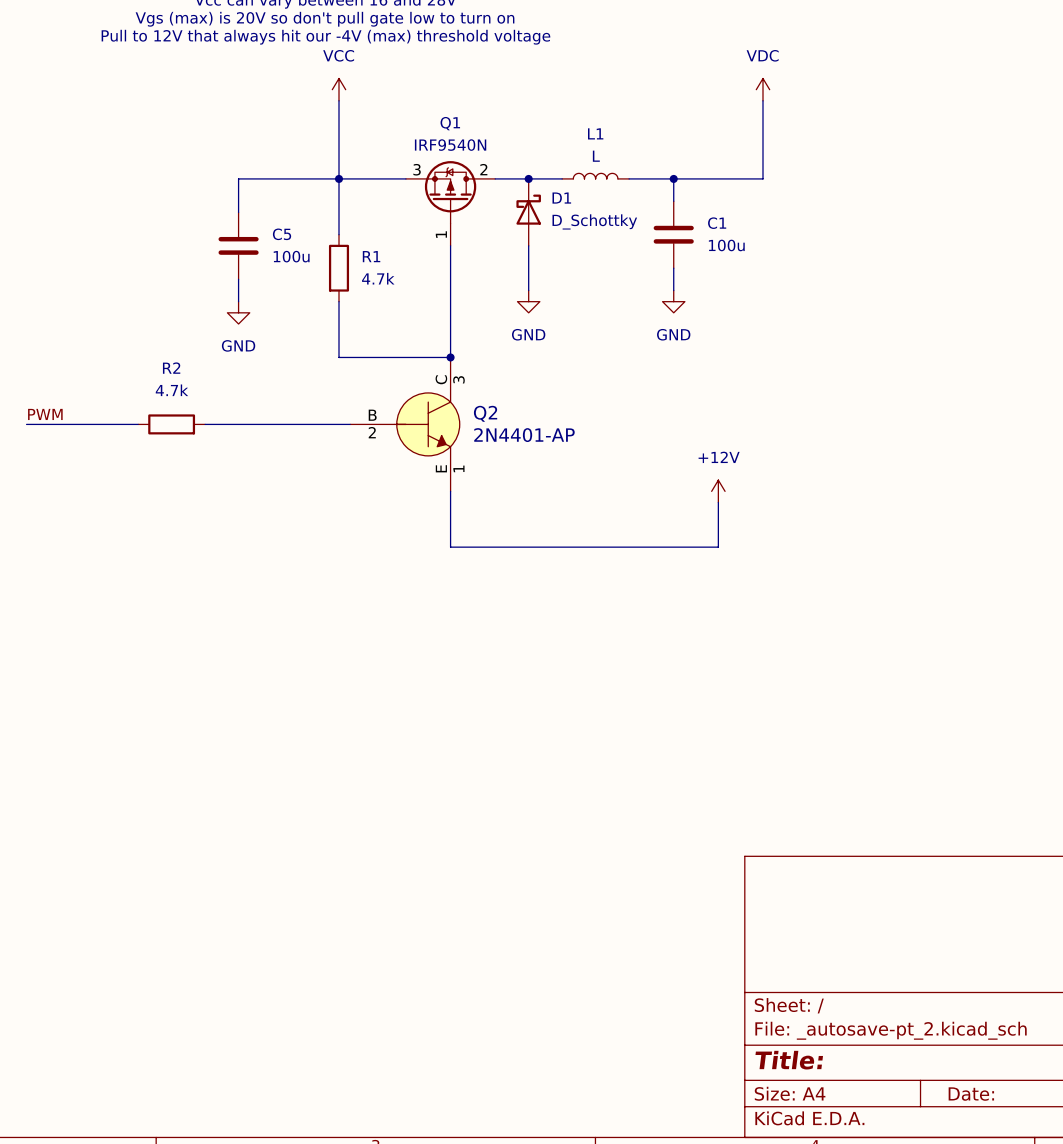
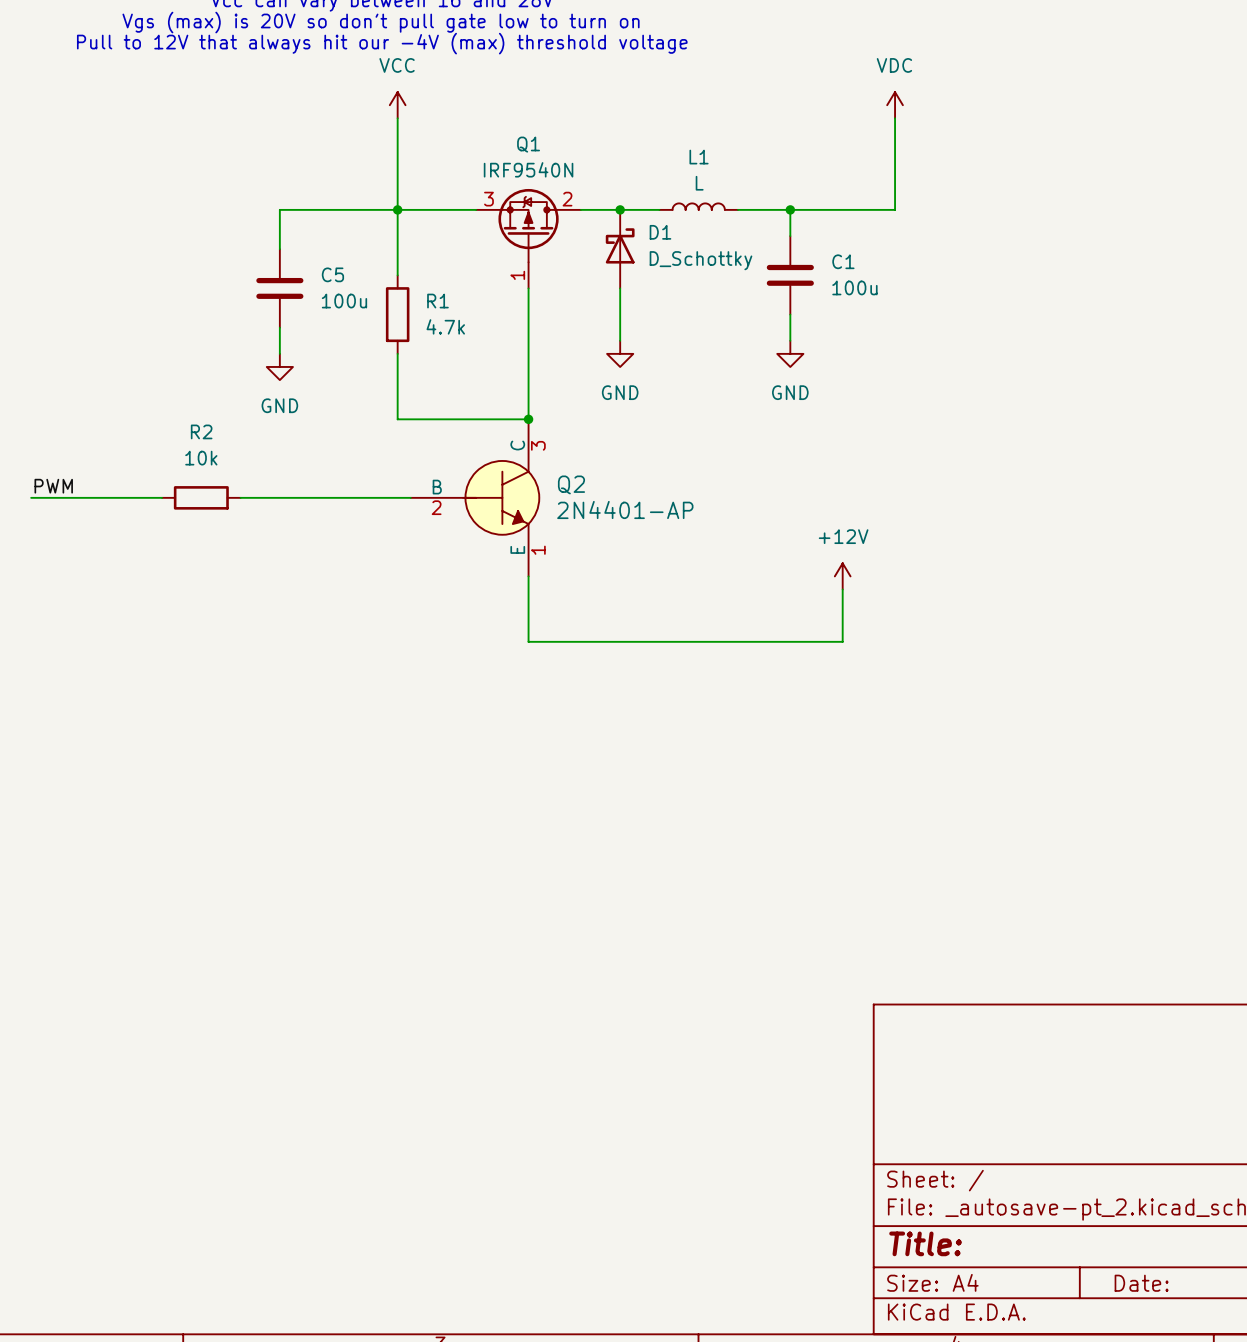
R2 value: 4.7k (171, 390) -> 10k (201, 458)

